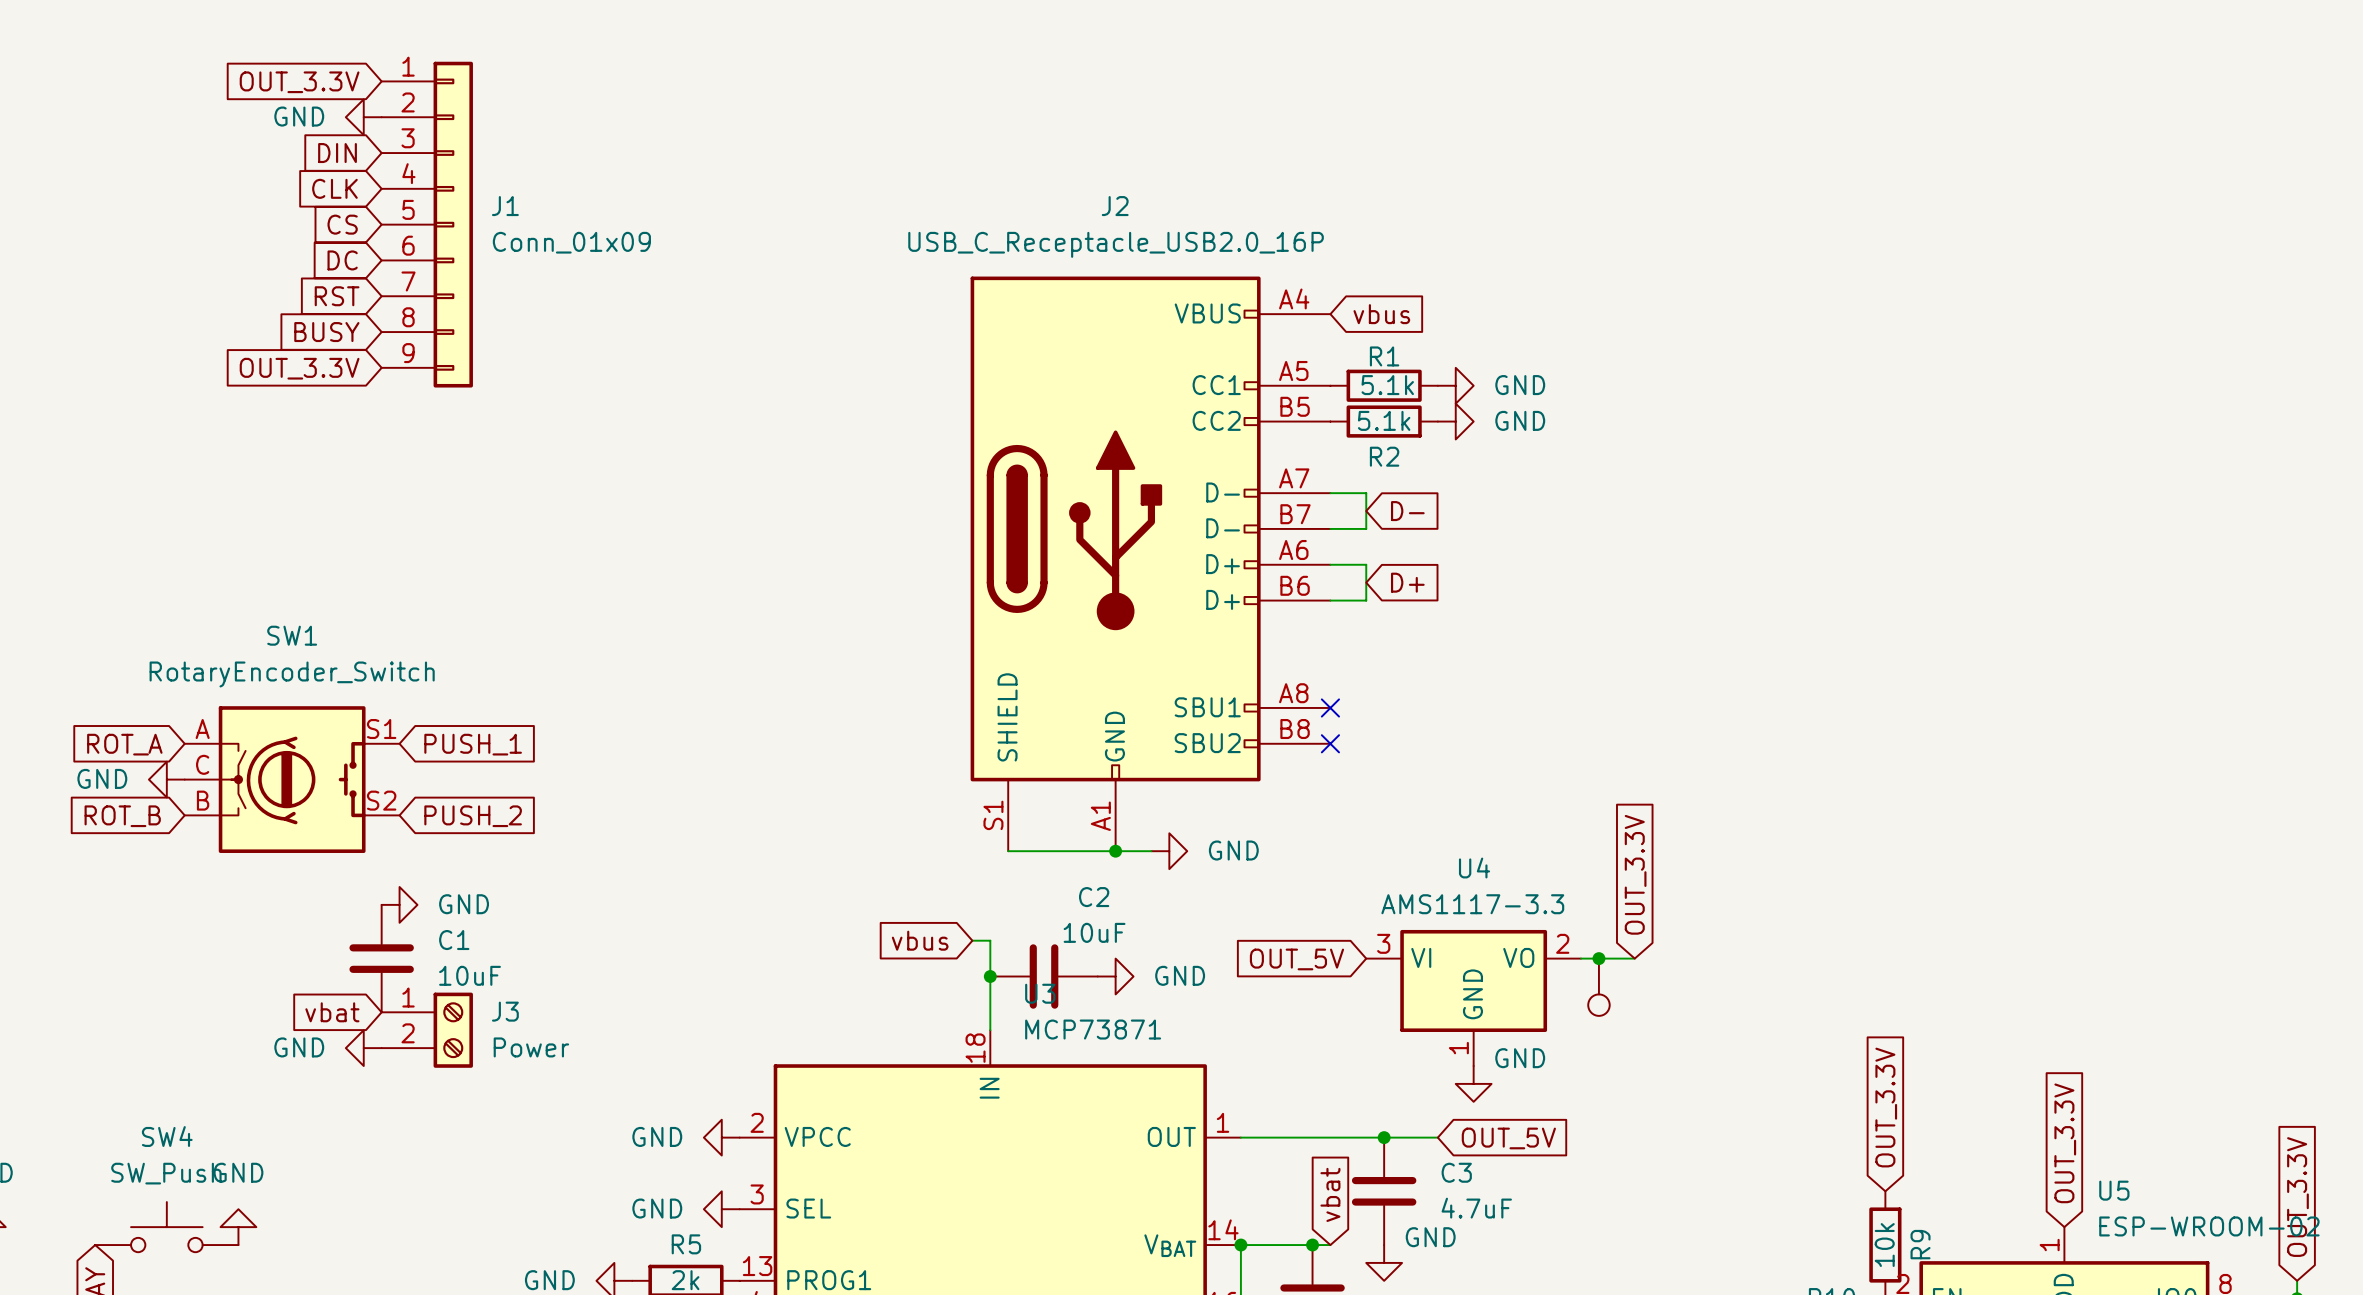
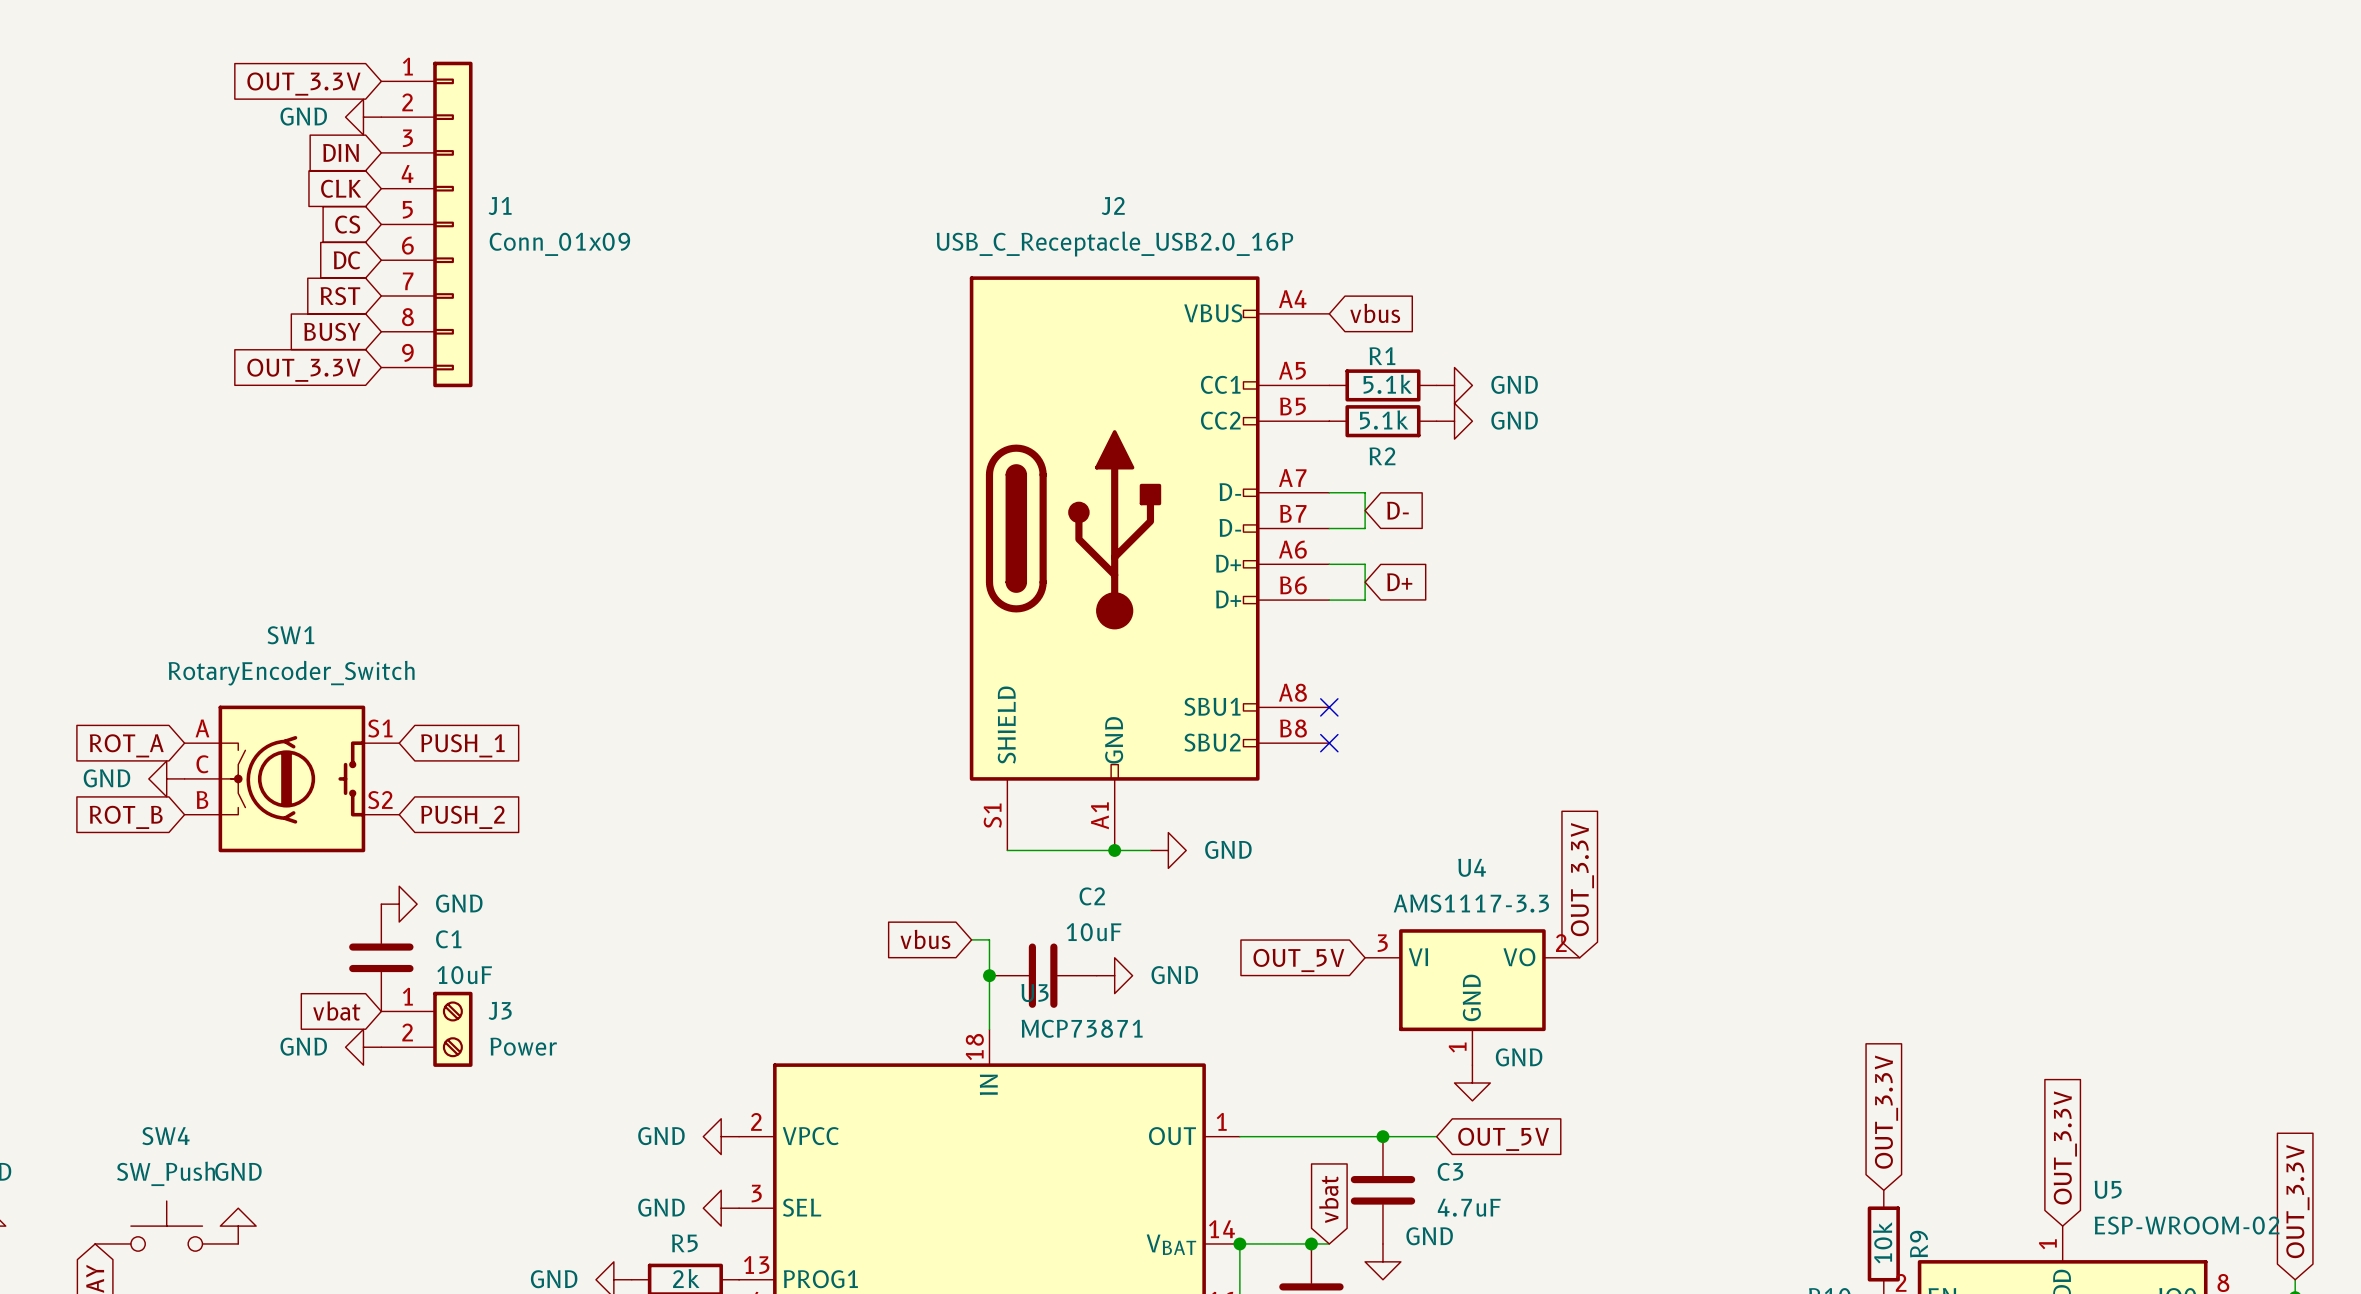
global label position: OUT_3.3V (1635, 874) -> OUT_3.3V (1582, 879)
wire: (1581, 958) (1634, 958) -> none
junction: (1598, 958) -> none
part: (1598, 987) -> none

